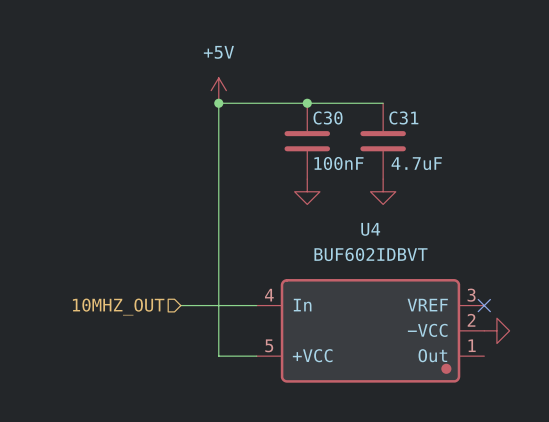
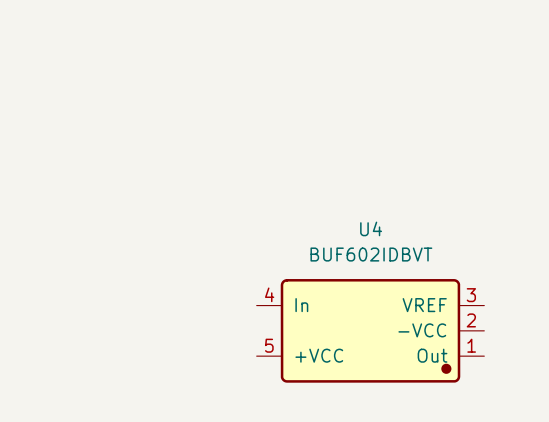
power symbol: +5V (218, 90) -> none
junction: (218, 103) -> none
junction: (307, 103) -> none
wire: (383, 103) (218, 103) (218, 356) (256, 356) -> none
C30: 100nF (307, 141) -> none
C31: 4.7uF (383, 141) -> none
power symbol: (307, 191) -> none
power symbol: (383, 191) -> none
wire: (180, 305) (256, 305) -> none
no-connect mark: (484, 305) -> none
hierarchical label: 10MHZ_OUT (118, 307) -> none
power symbol: (496, 330) -> none

